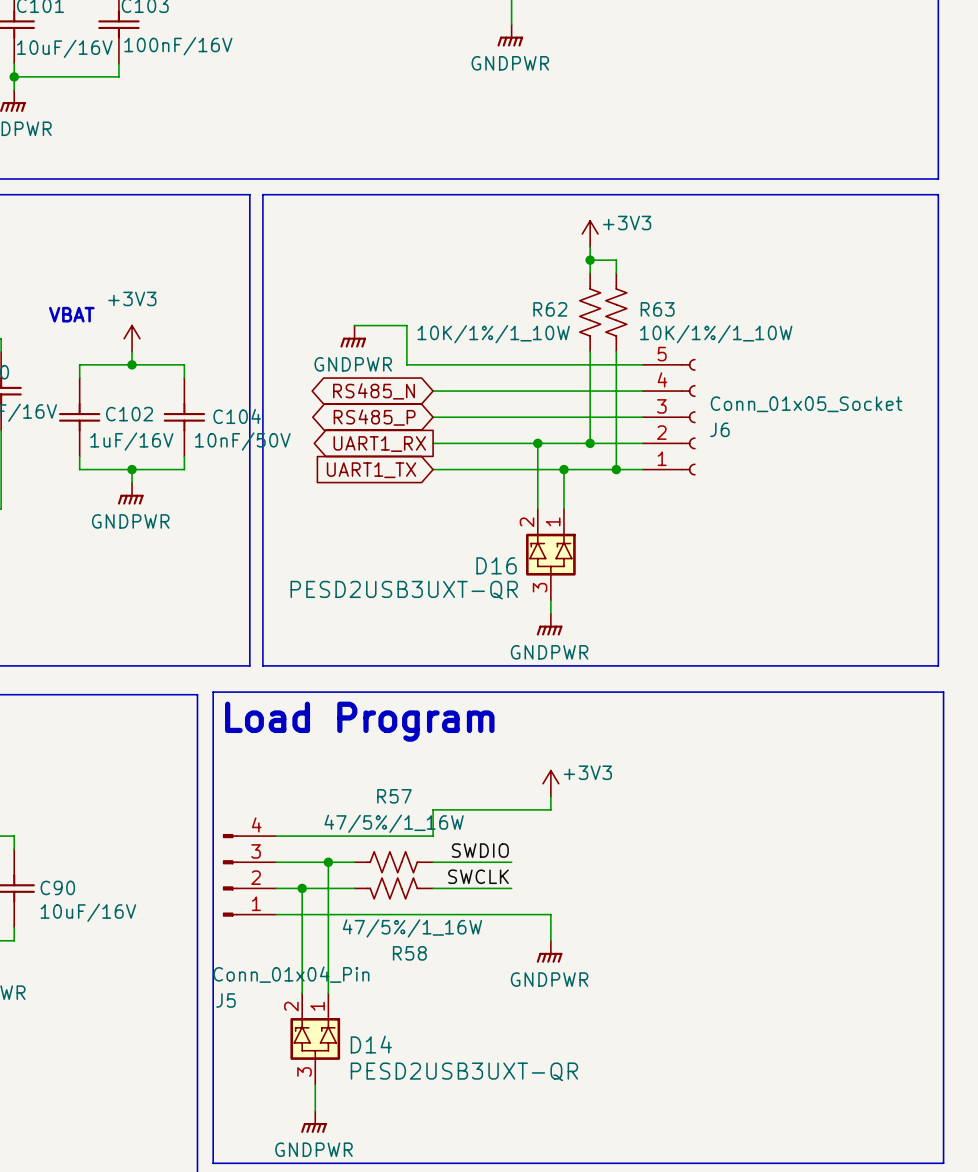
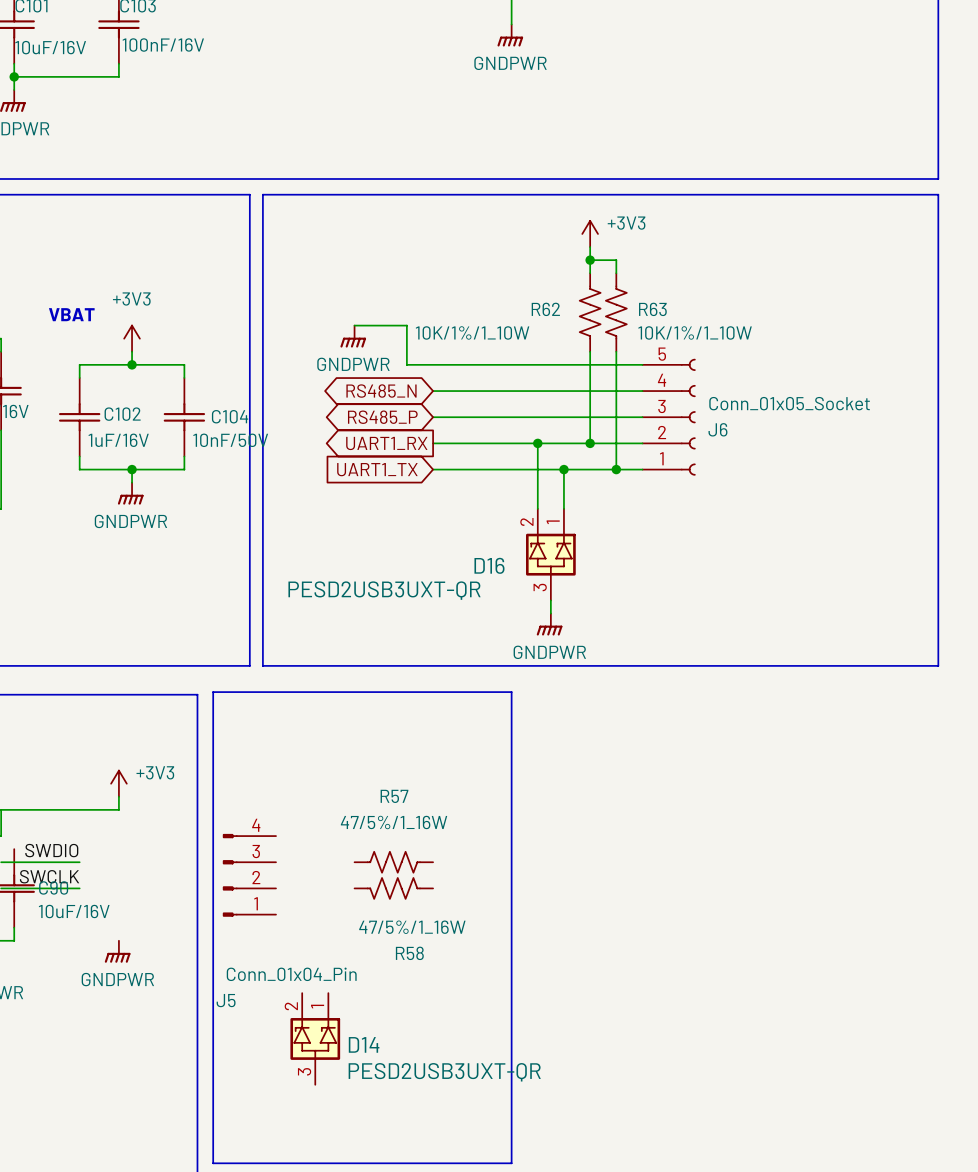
line: (511, 692) (943, 692) (943, 1163) (511, 1163) -> (511, 692) (511, 1163)
text: Load Program (359, 721) -> none
power symbol: none -> +3V3 (118, 783)
power symbol: +3V3 (550, 783) -> none
wire: (550, 796) (550, 809) (433, 809) (433, 836) (276, 836) -> none
wire: (1, 836) (14, 836) (14, 849) -> (1, 836) (1, 809) (118, 809) (118, 796)
label: none -> SWDIO (51, 850)
label: SWDIO (480, 850) -> none
wire: none -> (1, 862) (79, 862)
wire: (276, 862) (354, 862) -> none
wire: (328, 862) (328, 993) -> none
junction: (328, 862) -> none
wire: (433, 862) (511, 862) -> none
label: none -> SWCLK (49, 876)
label: SWCLK (478, 876) -> none
wire: none -> (1, 888) (79, 888)
wire: (276, 888) (354, 888) -> none
wire: (302, 888) (302, 993) -> none
junction: (302, 888) -> none
wire: (433, 888) (511, 888) -> none
wire: (276, 914) (550, 914) (550, 940) -> none
power symbol: none -> GNDPWR (117, 951)
power symbol: GNDPWR (549, 951) -> none
wire: (315, 1084) (315, 1110) -> none
power symbol: GNDPWR (313, 1121) -> none

